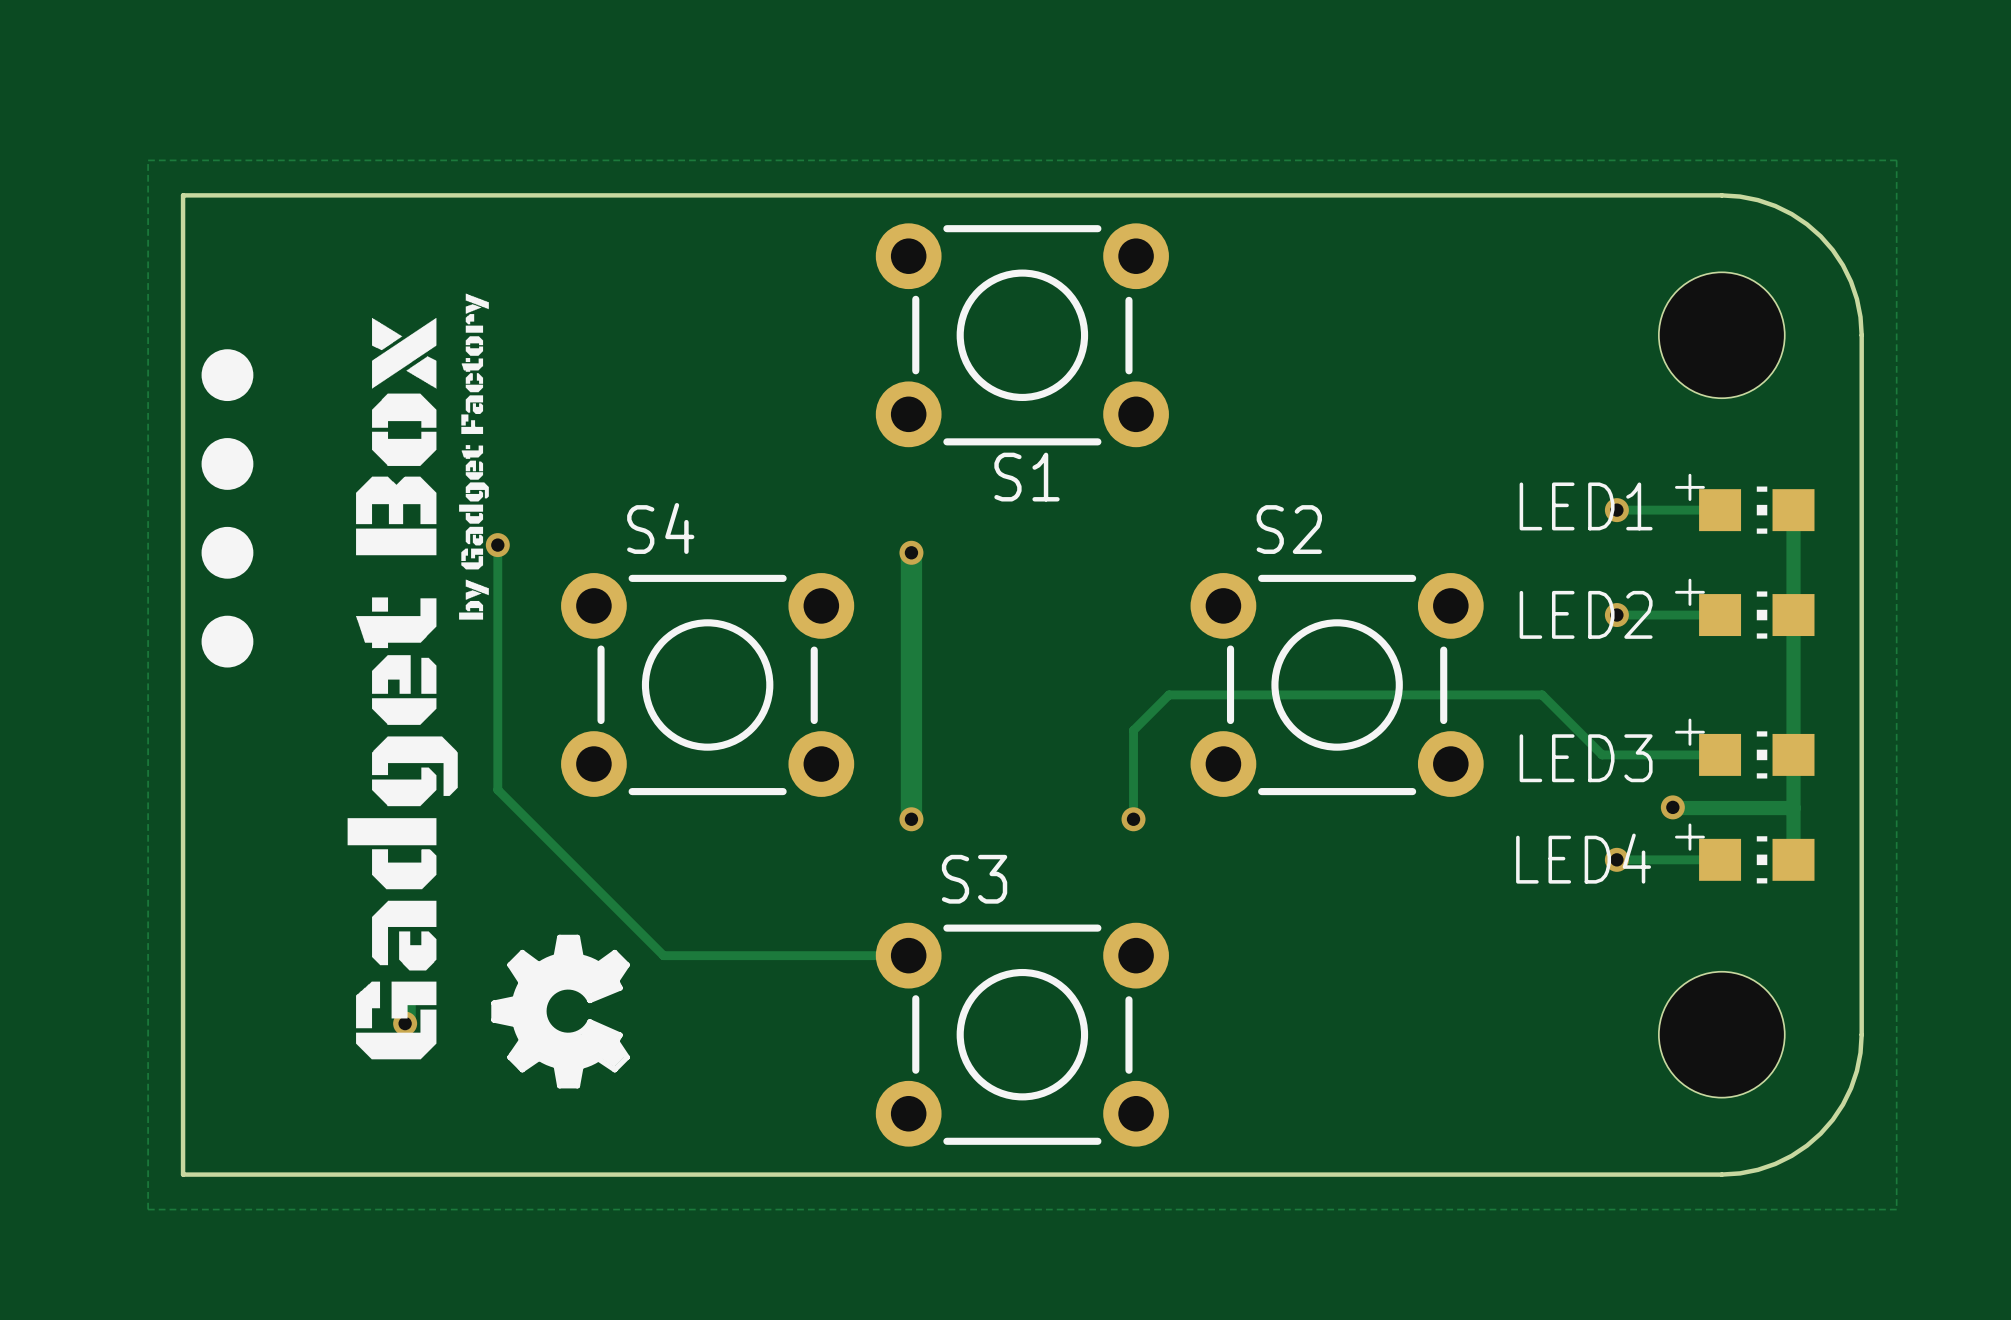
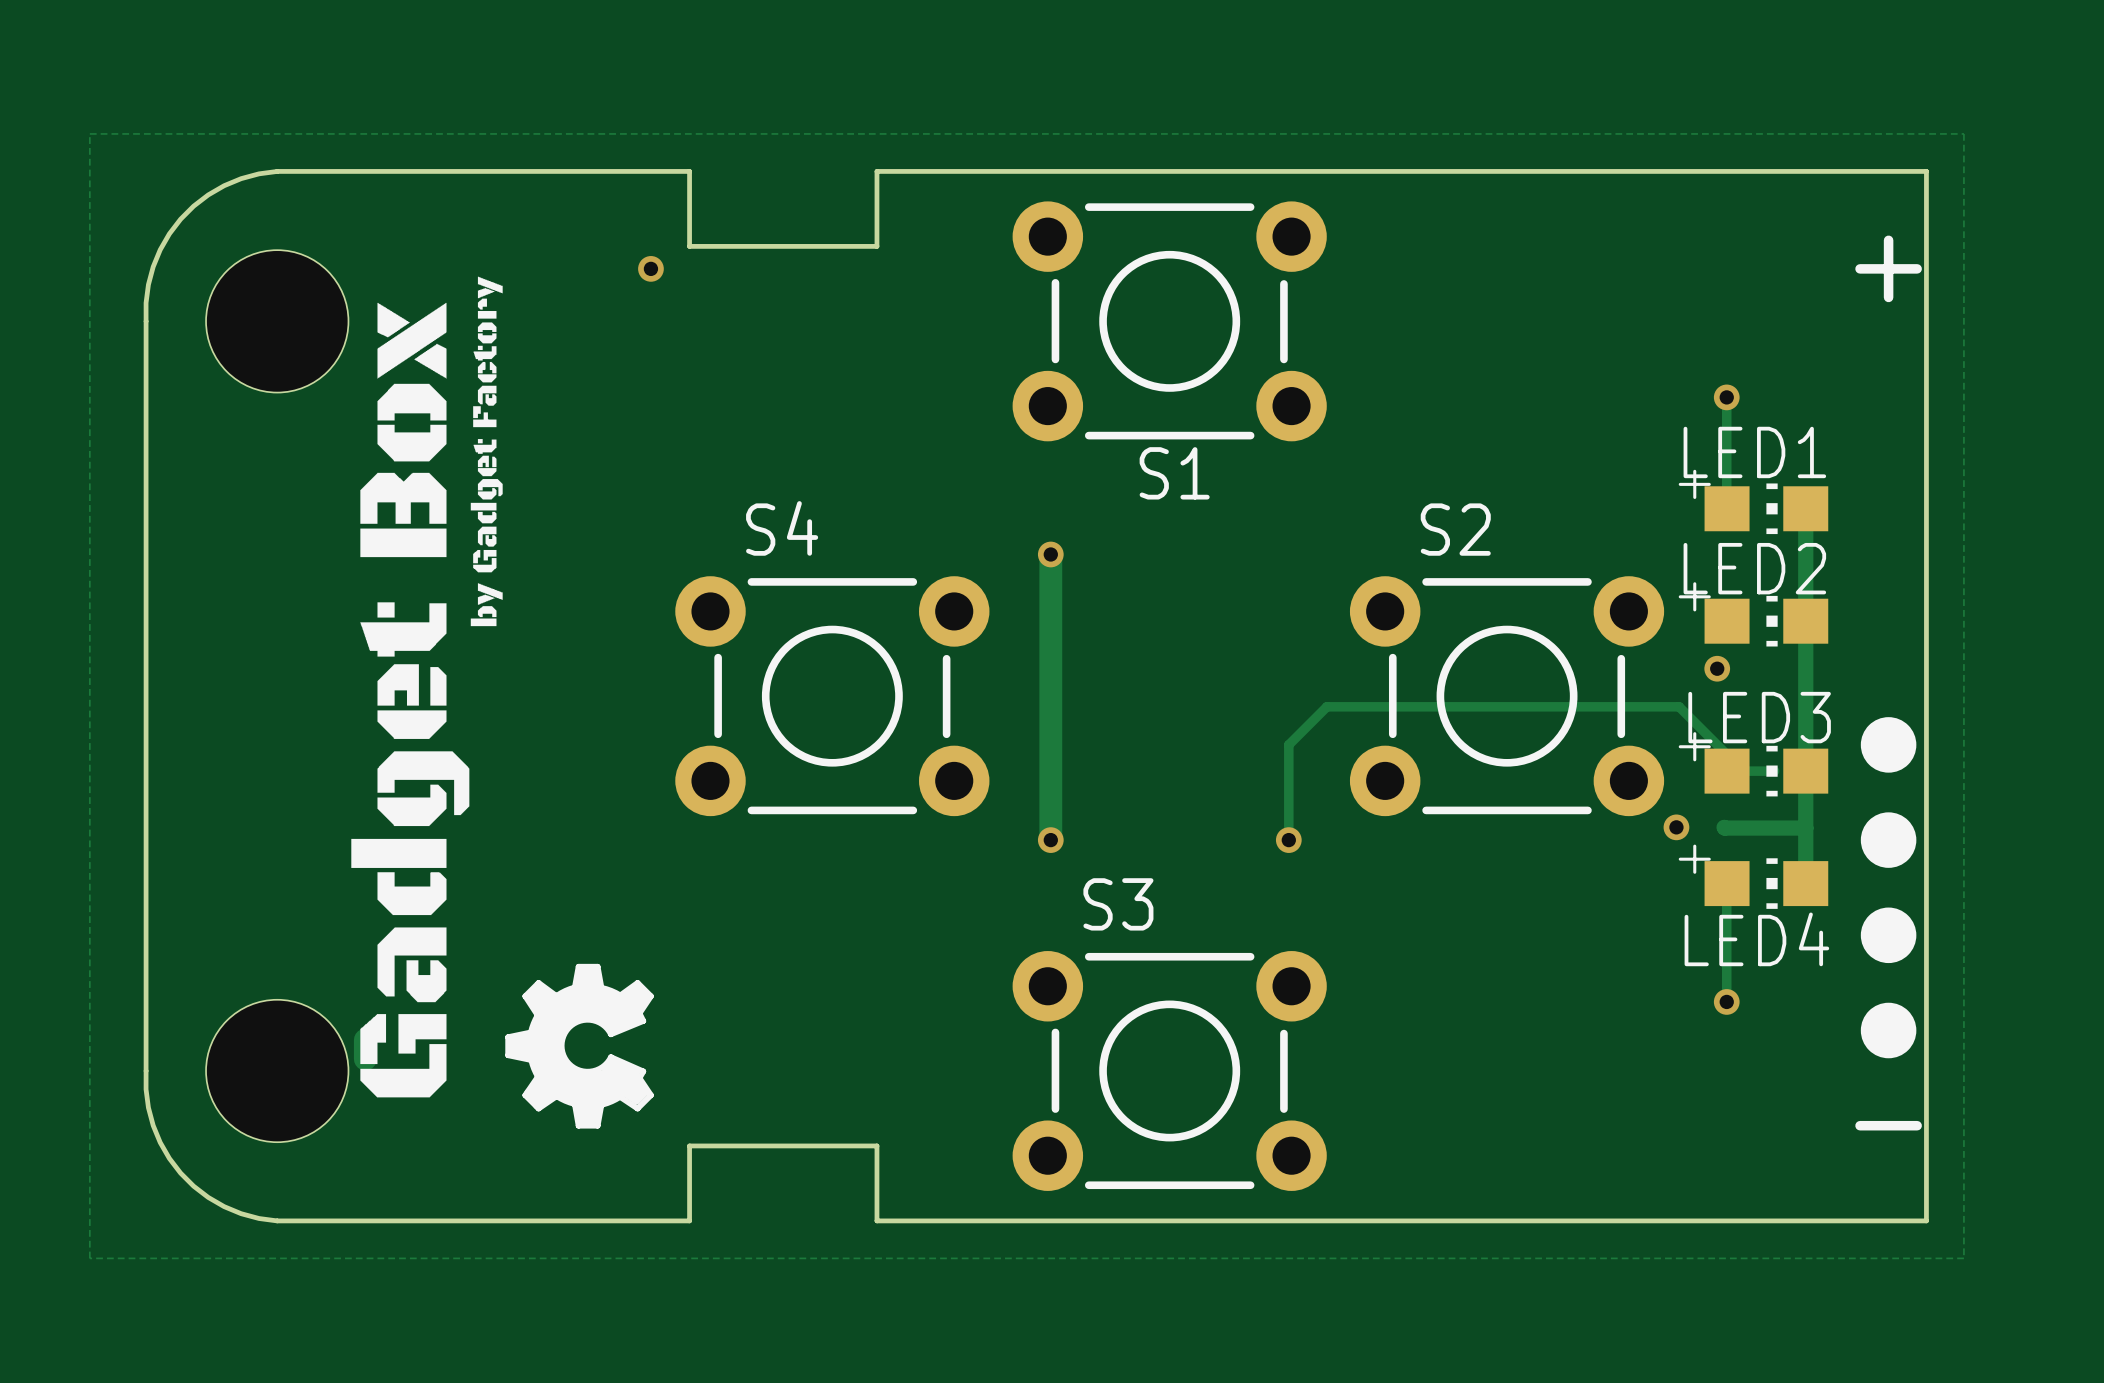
part footprint: [180, 193, 1864, 1177] -> [143, 169, 1929, 1224]
line: none -> (1888, 240) (1888, 297)
via: none -> (650, 268)
line: none -> (1860, 268) (1917, 268)
S1 position: (1022, 335) -> (1169, 321)
drawing: [201, 349, 254, 668] -> none
track: none -> (1726, 397) (1726, 508)
via: none -> (1726, 397)
LED1 name position: LED1 (1586, 506) -> LED1 (1754, 452)
track: (1616, 510) (1720, 510) -> none
via: (1616, 510) -> none
LED1 position: (1756, 510) -> (1766, 508)
track: (1793, 510) (1793, 859) -> (1805, 508) (1805, 883)
track: (497, 545) (497, 789) (663, 955) (908, 955) -> none
via: (497, 545) -> none
track: (911, 552) (911, 819) -> (1050, 554) (1050, 840)
via position: (911, 552) -> (1050, 554)
LED2 name position: LED2 (1586, 614) -> LED2 (1754, 568)
track: (1616, 615) (1720, 615) -> none
via position: (1616, 615) -> (1717, 668)
LED2 position: (1756, 615) -> (1766, 621)
drawing position: (418, 676) -> (426, 687)
S4 position: (707, 684) -> (832, 696)
S2 position: (1337, 684) -> (1507, 696)
track: (1302, 694) (1169, 694) (1133, 730) (1133, 819) -> (1326, 706) (1288, 744) (1288, 840)
track: (1542, 694) (1602, 754) (1675, 754) -> (1583, 706) (1679, 706) (1743, 771)
drawing: none -> [1860, 717, 1917, 1059]
LED3 position: (1756, 754) -> (1766, 771)
LED3 name position: LED3 (1586, 758) -> LED3 (1759, 717)
via: none -> (1676, 827)
via: (1672, 807) -> none
track: (1749, 808) (1793, 808) -> none
via: (911, 819) -> none
via: none -> (1050, 840)
via: (1133, 819) -> none
via: none -> (1288, 840)
LED4 name position: LED4 (1583, 858) -> LED4 (1756, 939)
track: (1616, 859) (1720, 859) -> none
via: (1616, 859) -> none
LED4 position: (1756, 859) -> (1766, 883)
track: none -> (1726, 883) (1726, 1001)
via: none -> (1726, 1001)
drawing position: (560, 1011) -> (579, 1046)
via: (405, 1023) -> none
S3 position: (1022, 1034) -> (1169, 1070)
line: none -> (1860, 1125) (1917, 1125)

